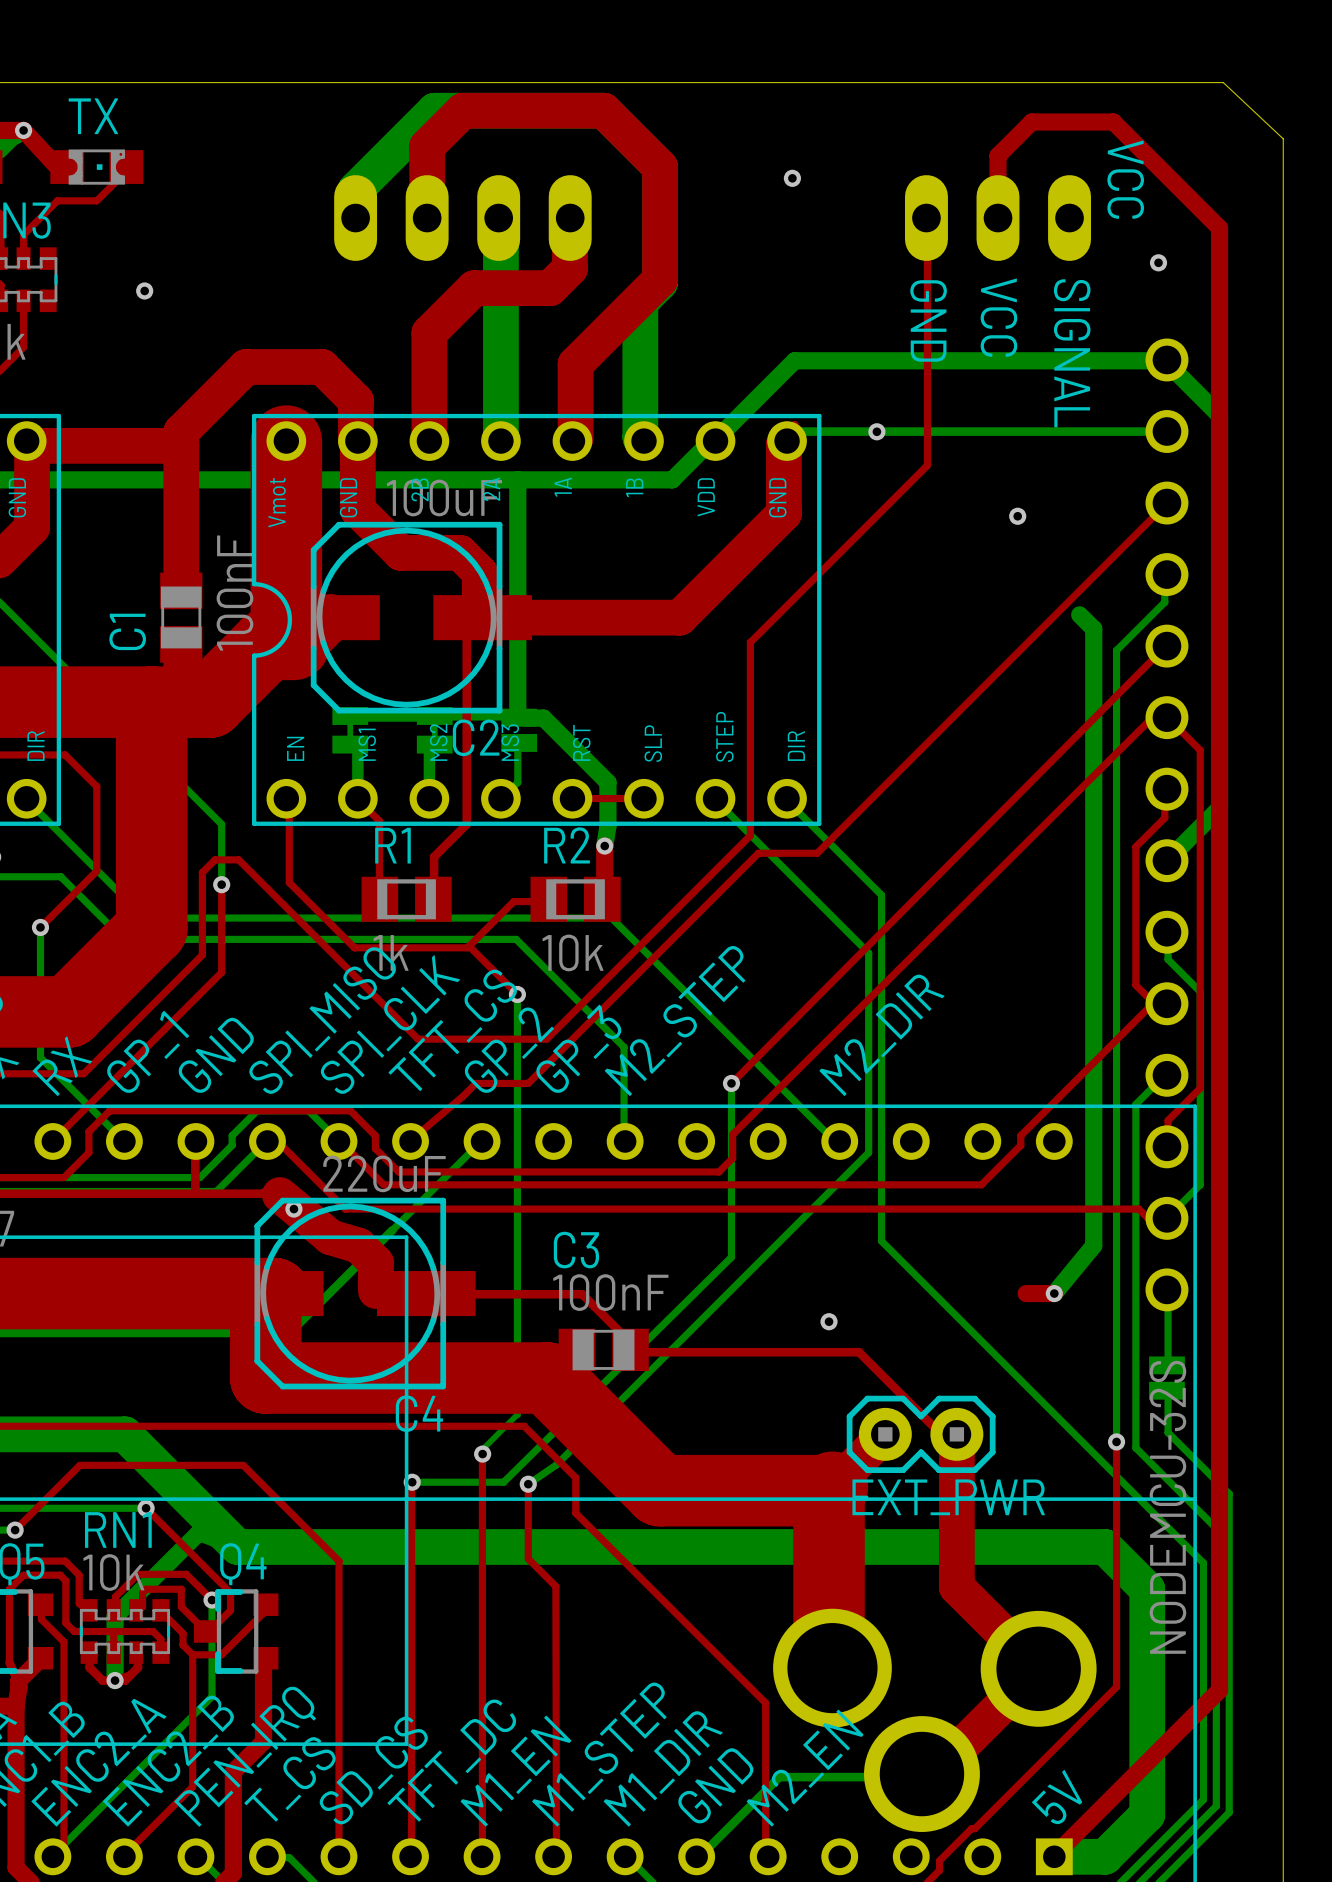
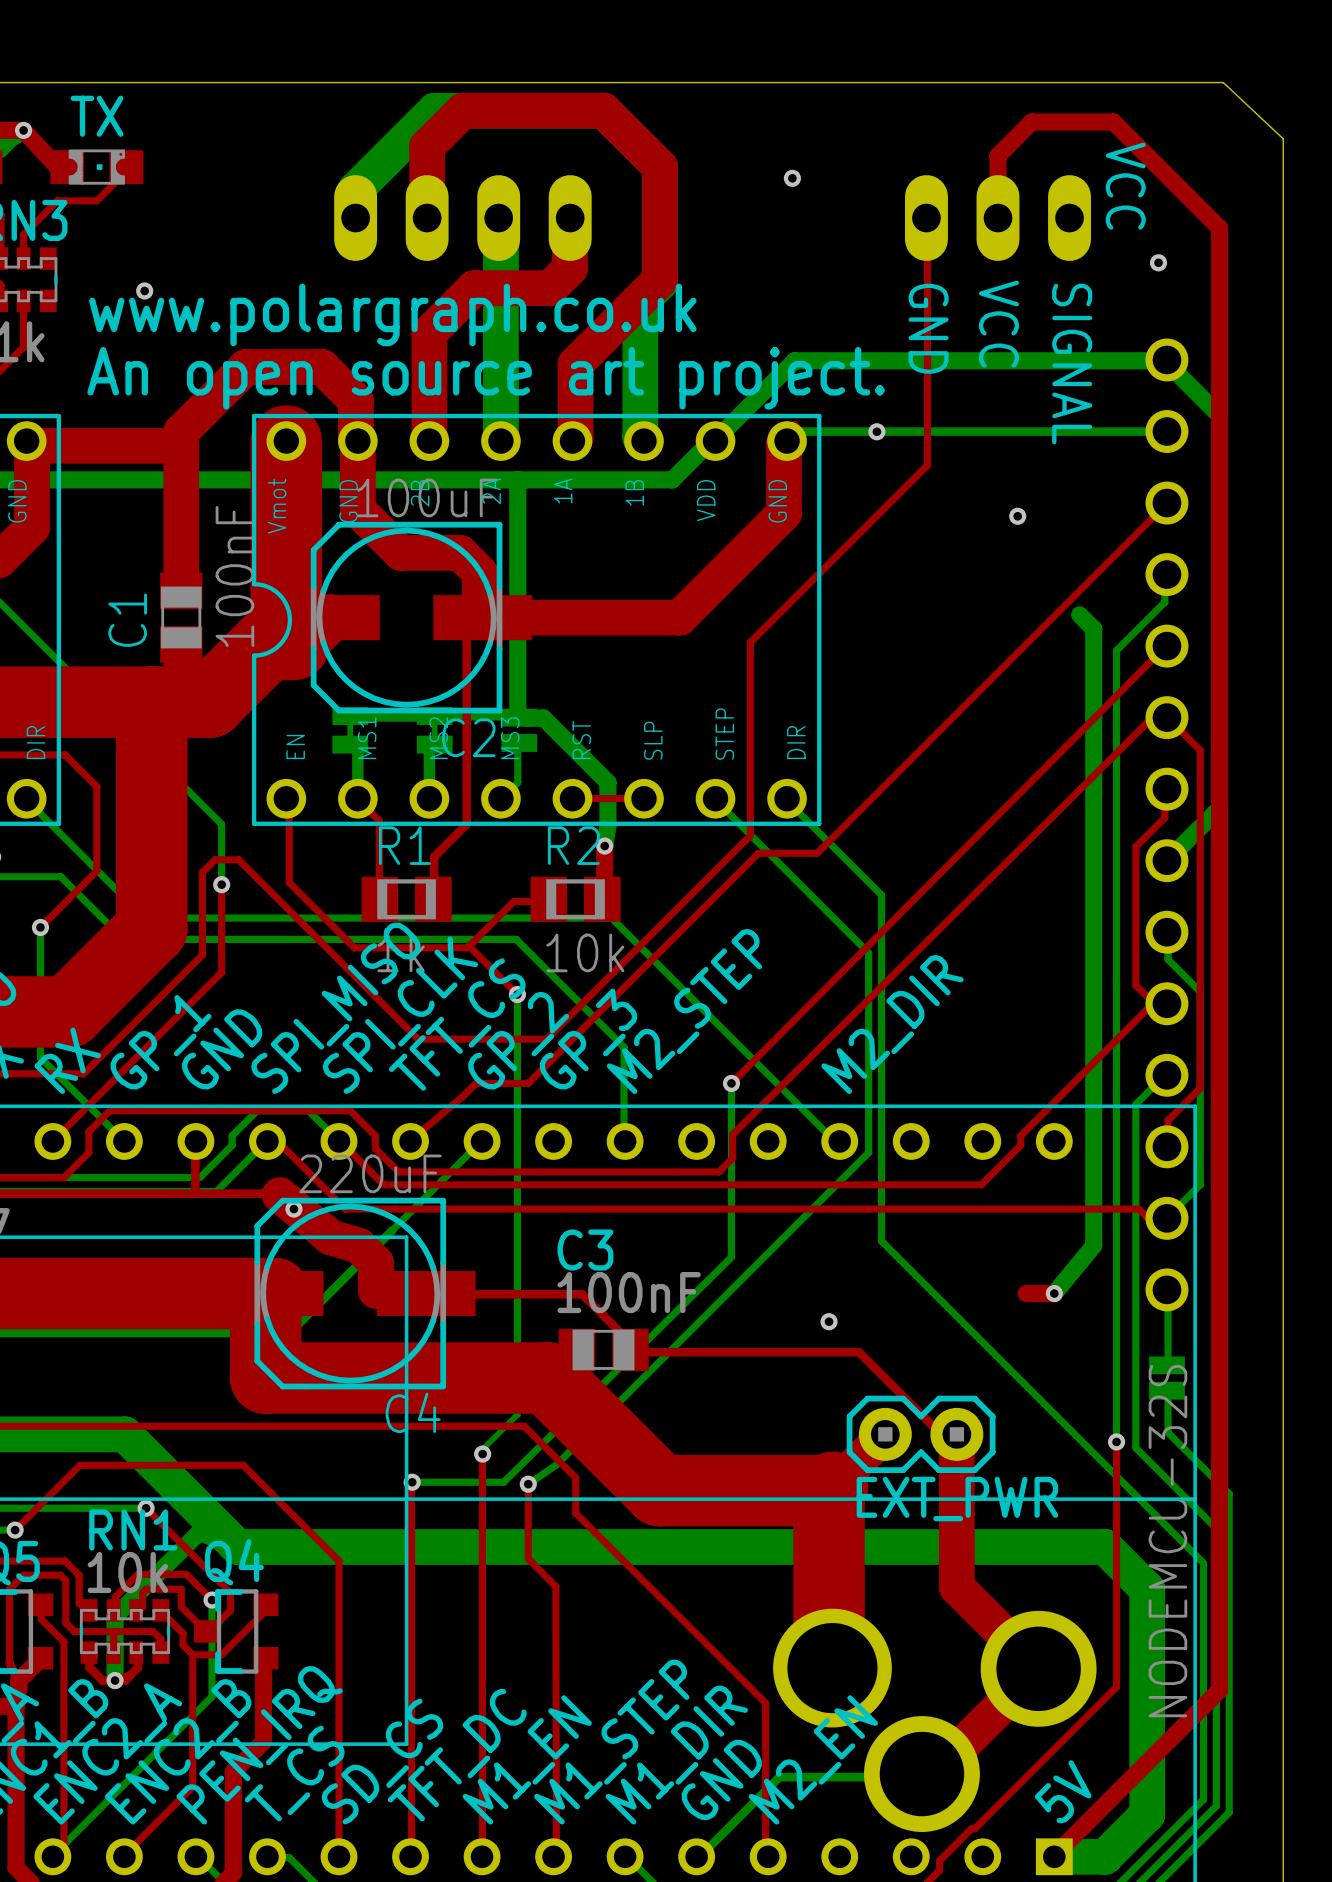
text: none -> www.polargraph.co.uk (392, 314)
text: none -> An open source art project. (486, 378)

